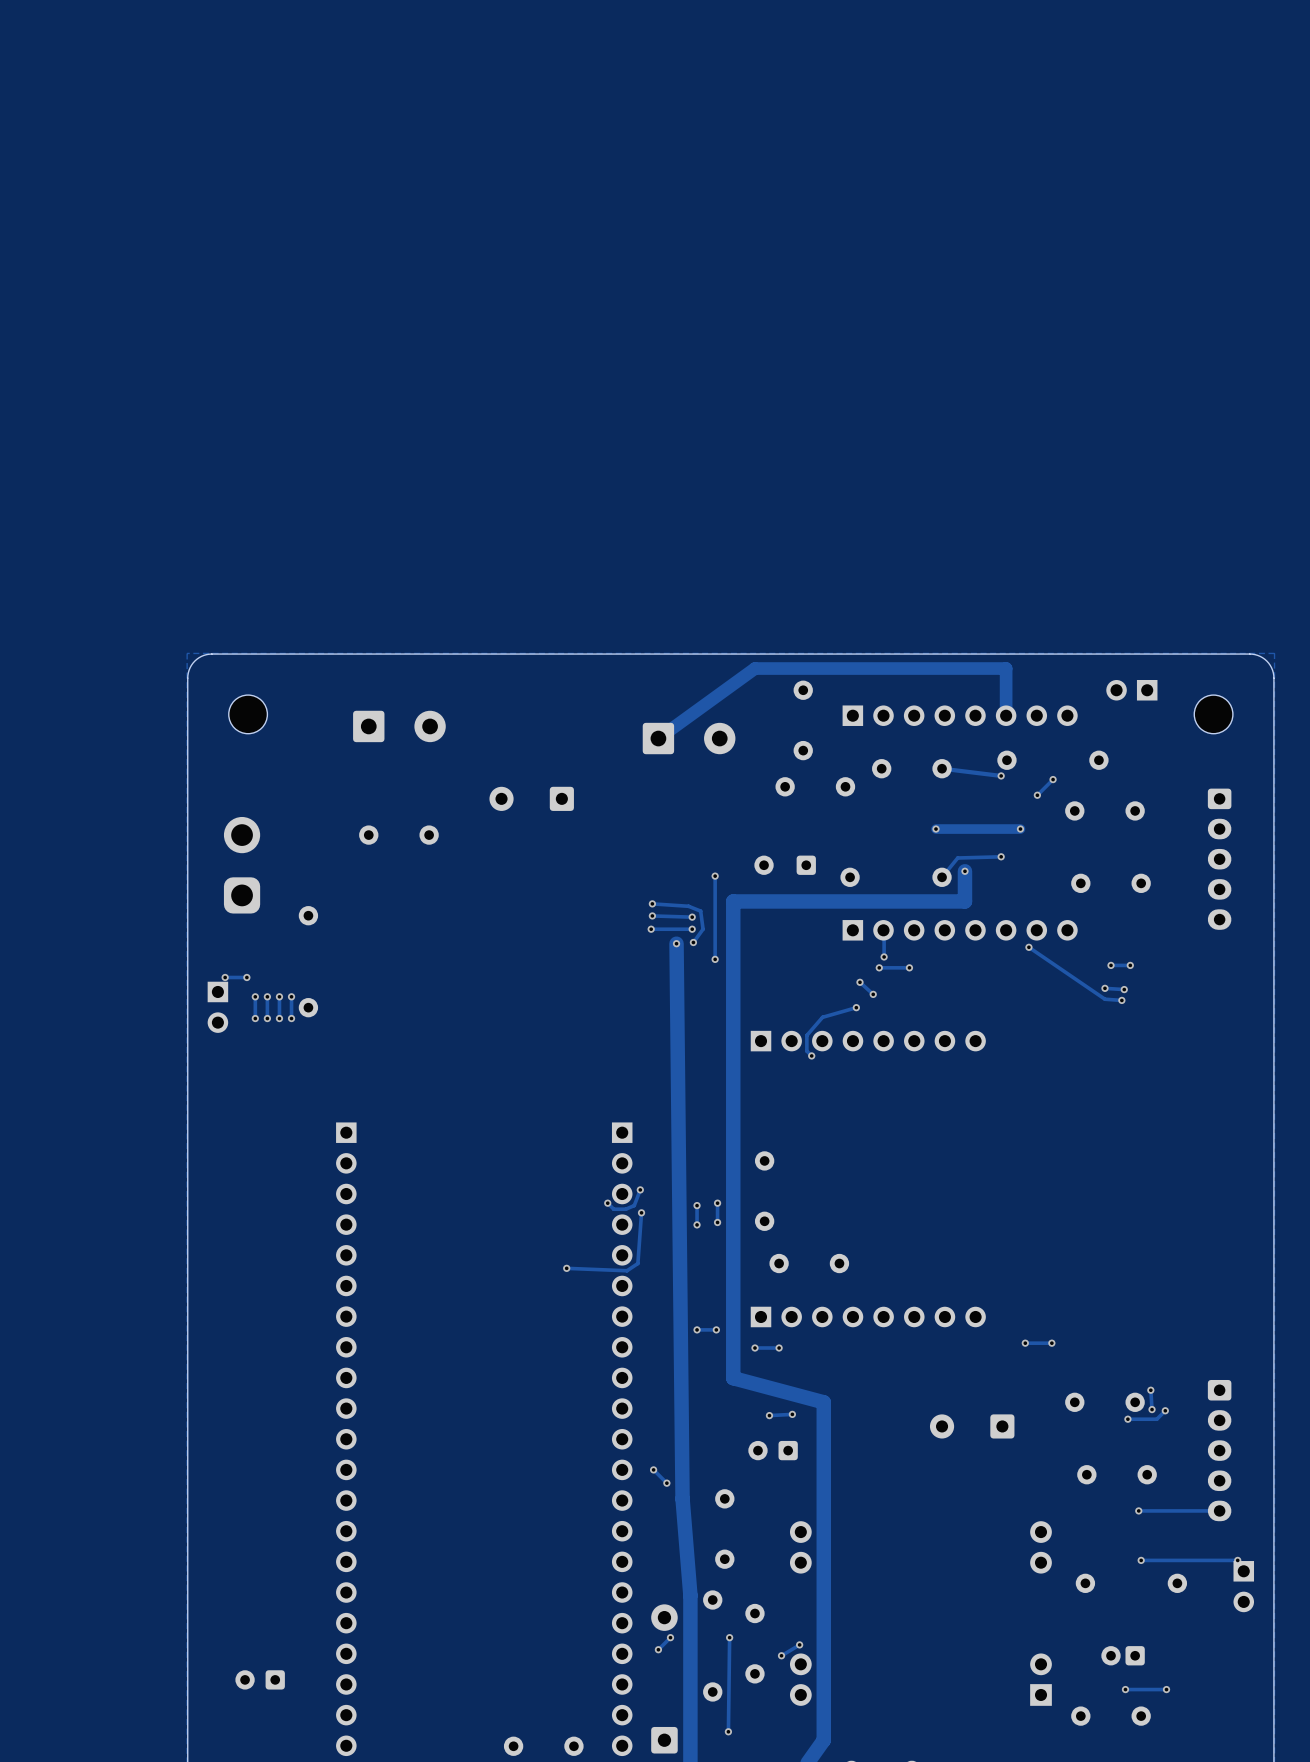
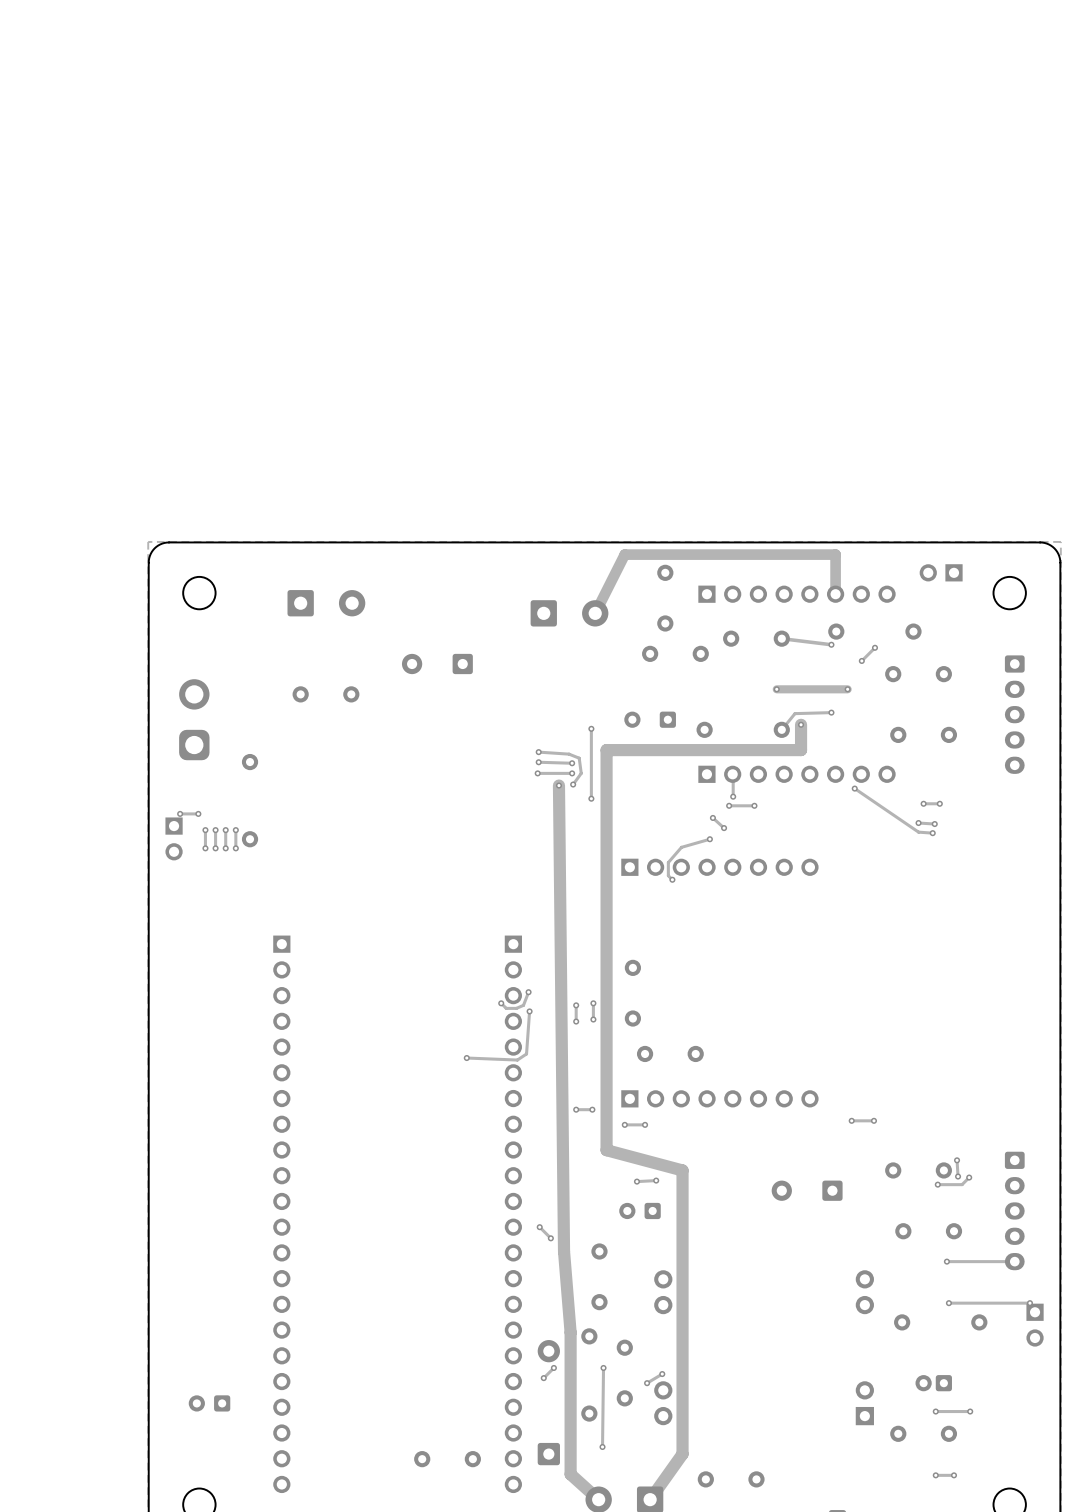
track: (754, 668) (658, 738) -> (624, 554) (595, 613)

